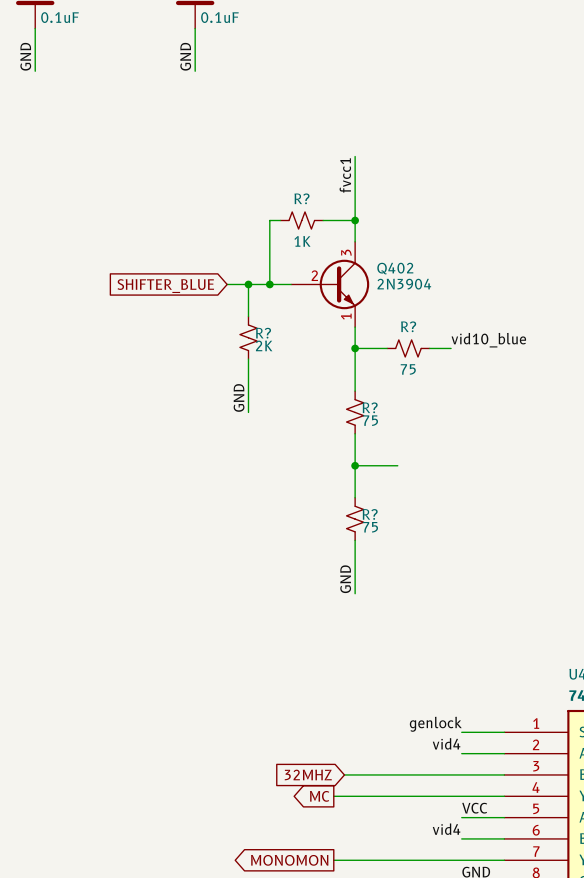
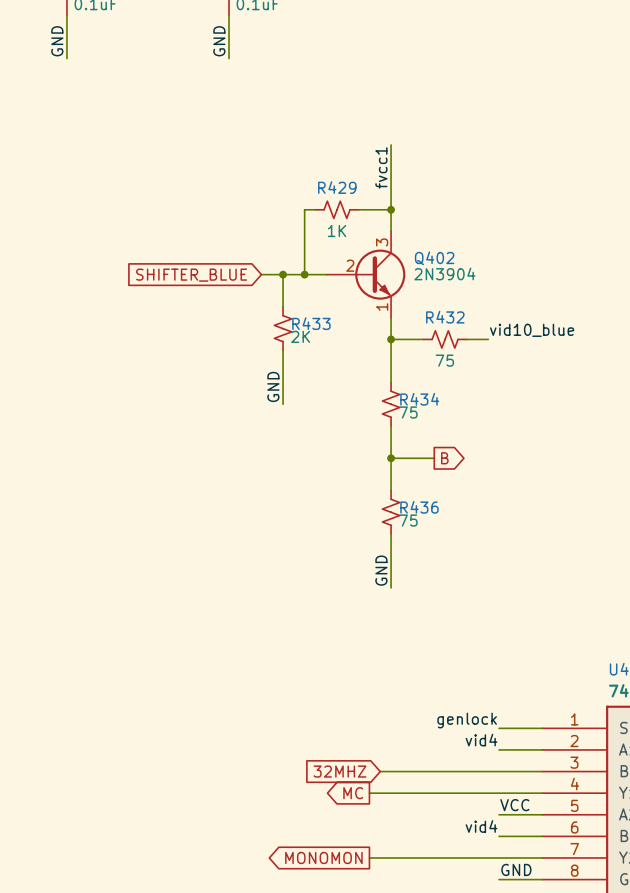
R? name: R? (301, 198) -> R429 (337, 187)
R? name: R? (408, 326) -> R432 (445, 317)
R? name: R? (263, 333) -> R433 (311, 323)
R? name: R? (370, 407) -> R434 (419, 399)
global label: none -> B (444, 458)
R? name: R? (370, 514) -> R436 (419, 507)

